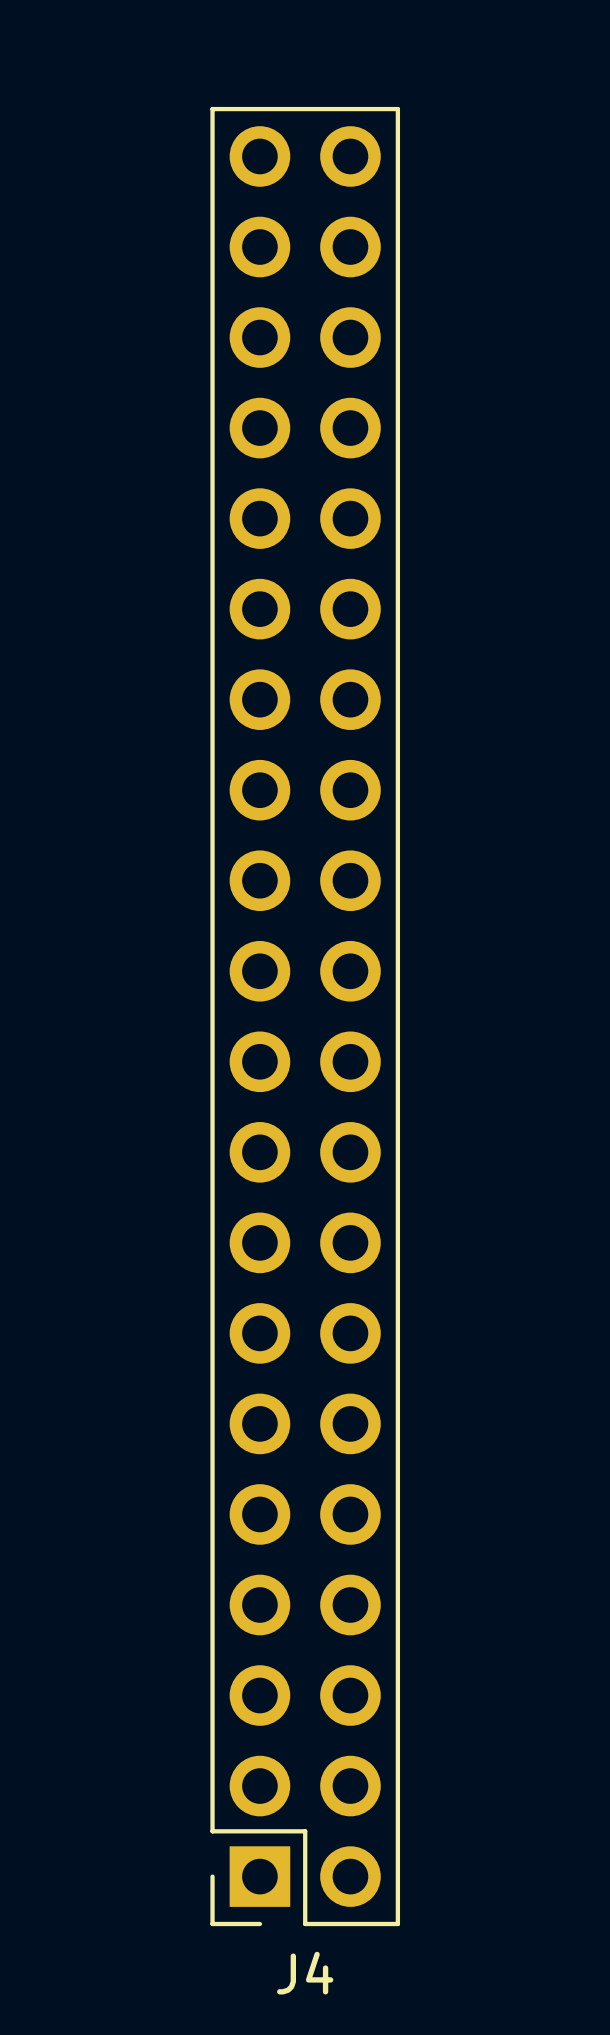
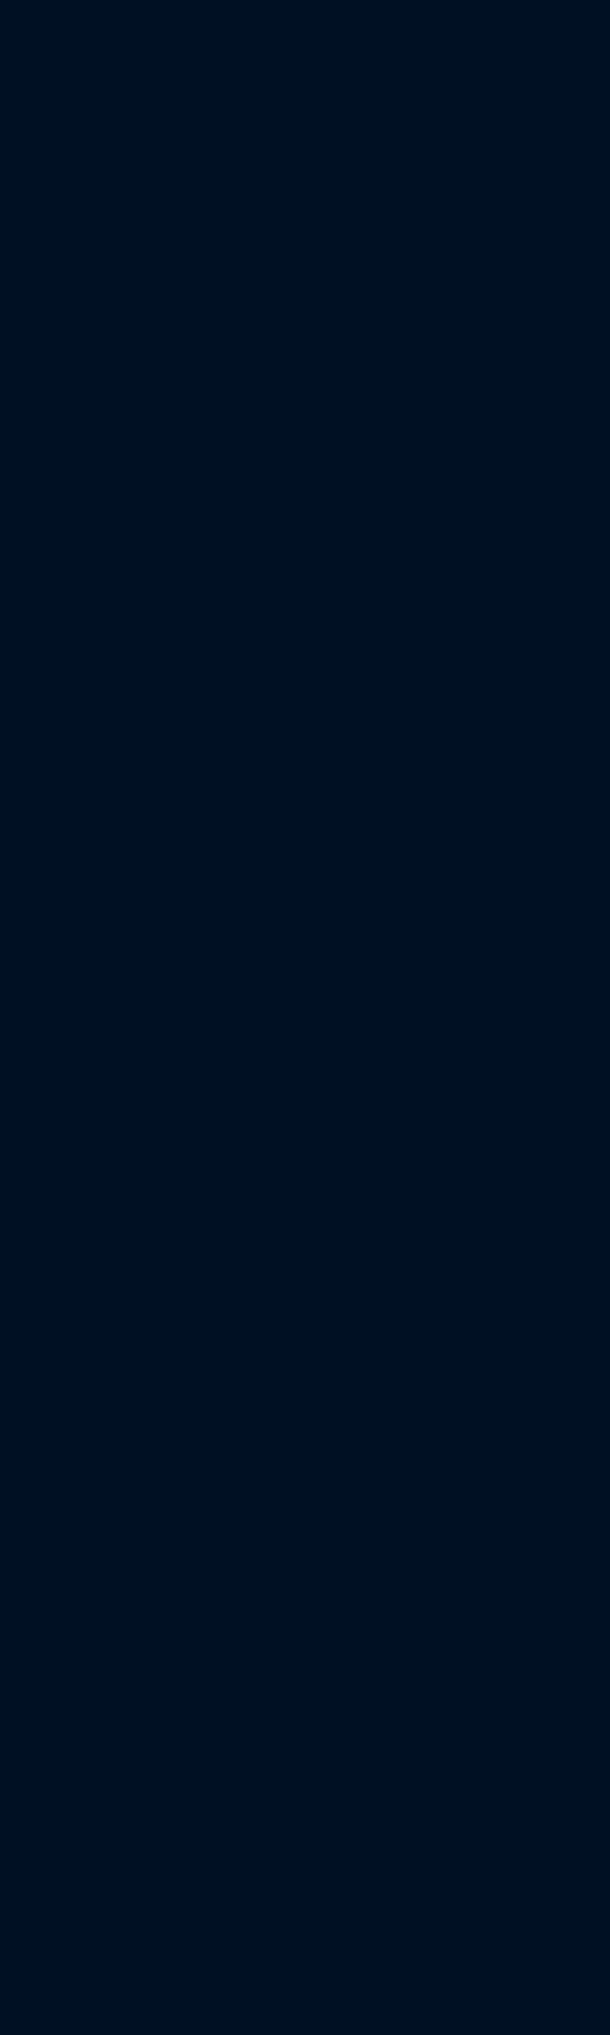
J4: (305, 1016) -> none

